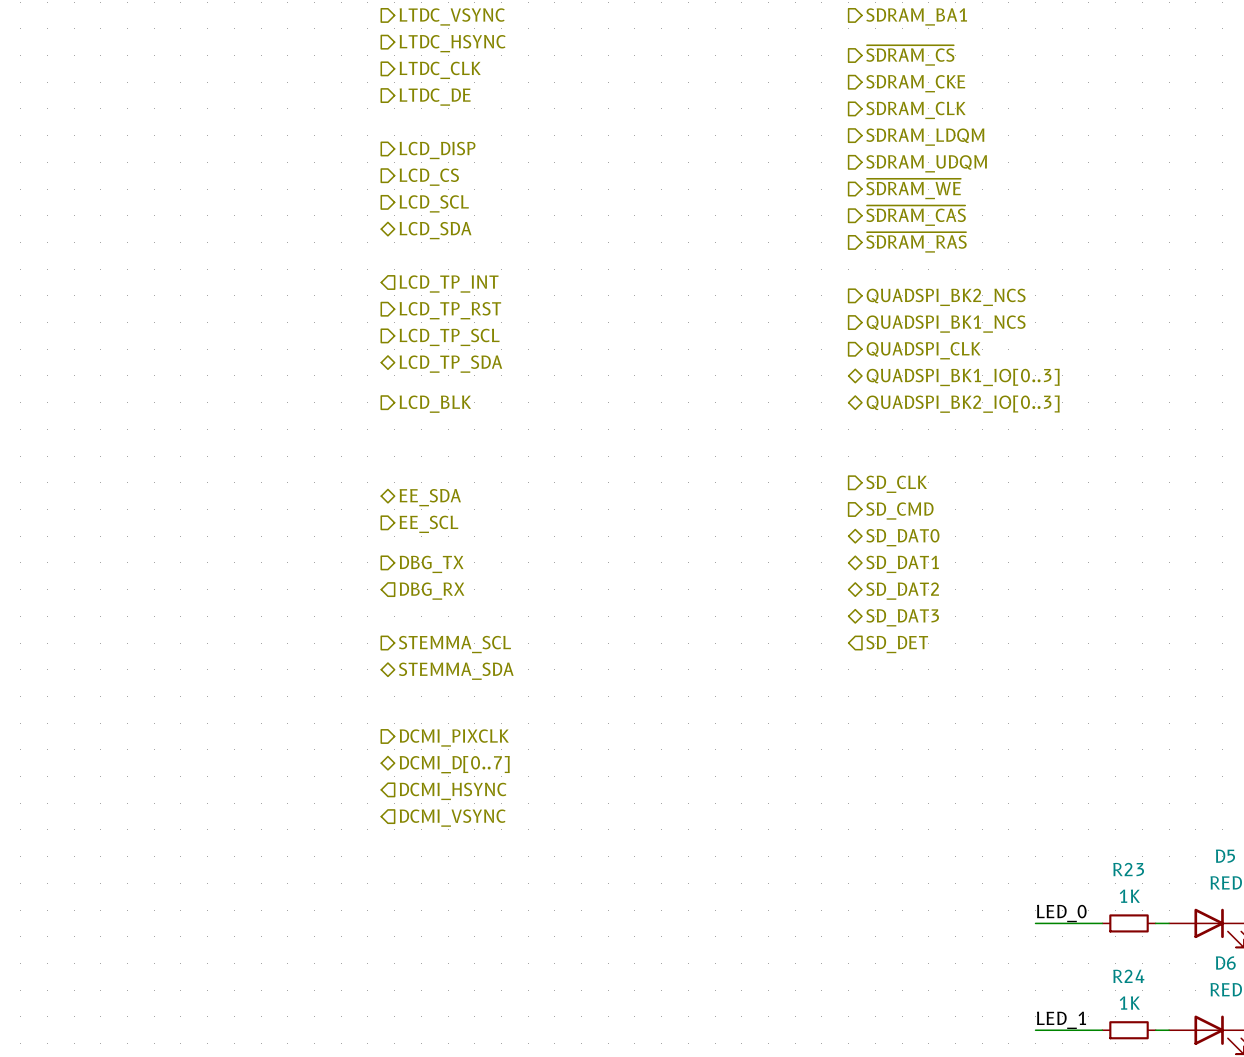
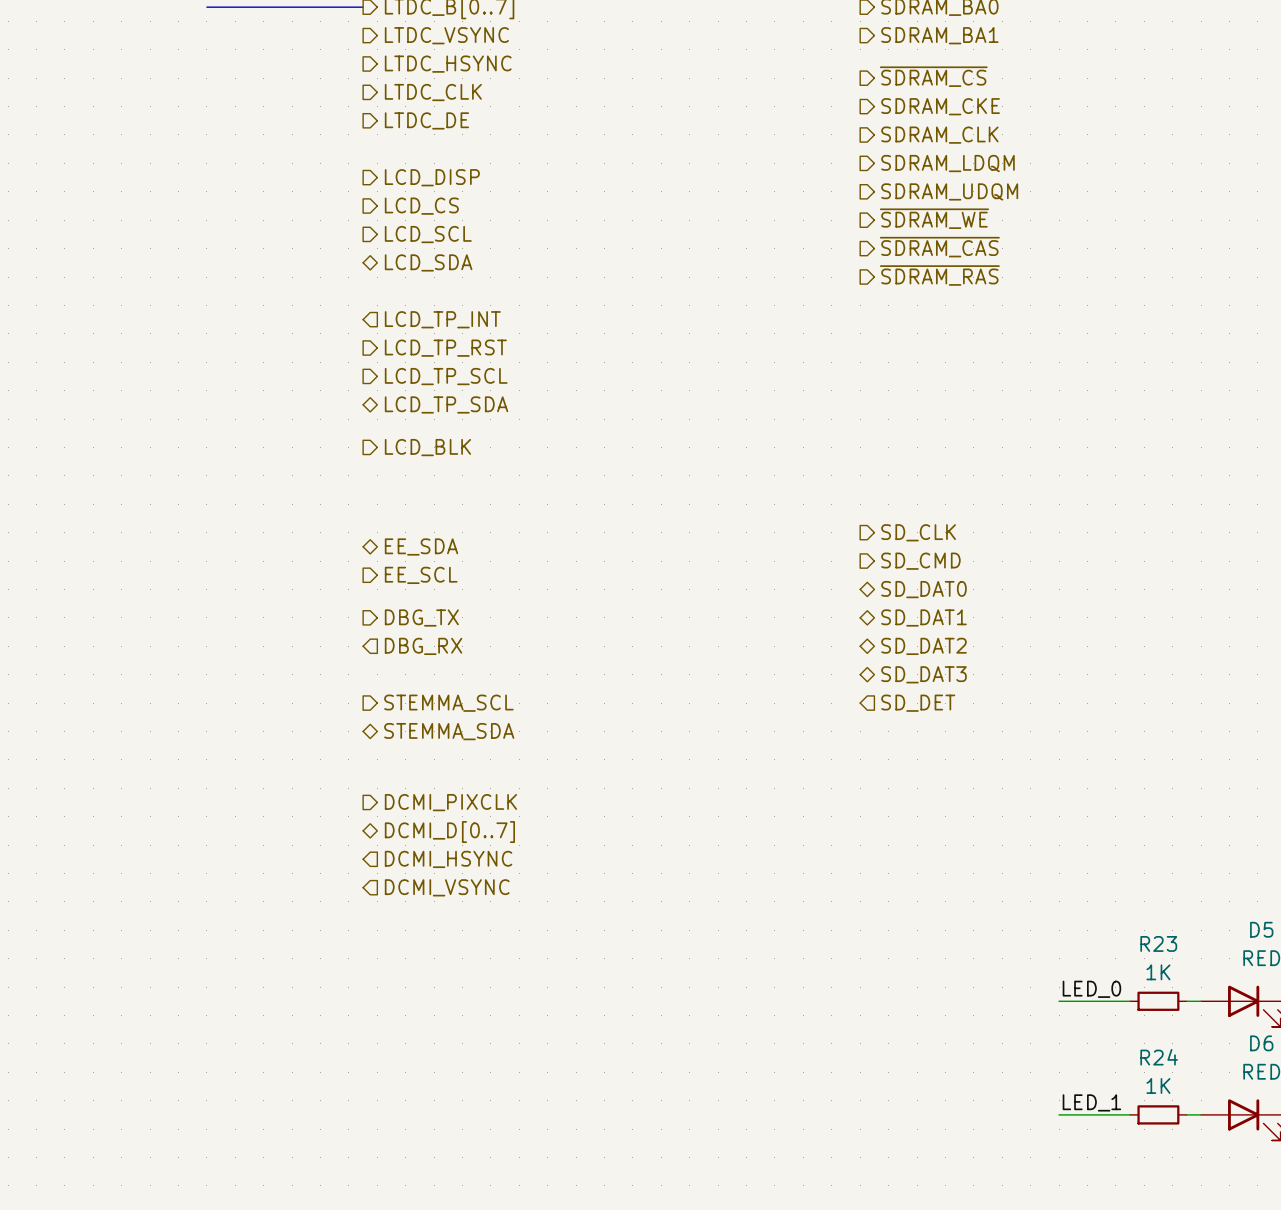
hierarchical label: QUADSPI_BK2_NCS (946, 297) -> none
hierarchical label: QUADSPI_BK1_NCS (946, 324) -> none
hierarchical label: QUADSPI_CLK (923, 350) -> none
hierarchical label: QUADSPI_BK1_IO[0..3] (963, 377) -> none
hierarchical label: QUADSPI_BK2_IO[0..3] (963, 404) -> none

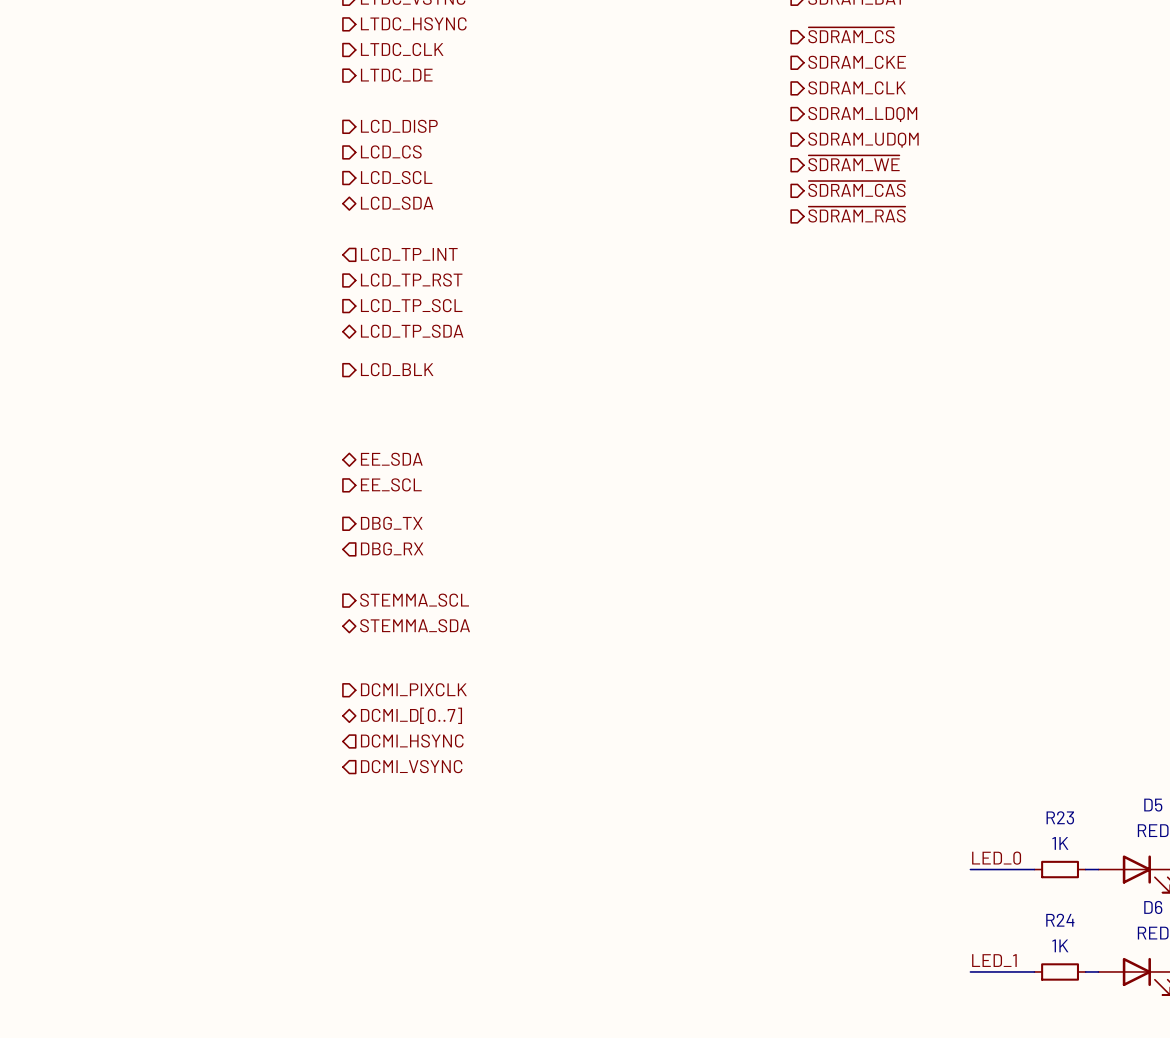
hierarchical label: SD_CLK (918, 532) -> none
hierarchical label: SD_CMD (920, 561) -> none
hierarchical label: SD_DAT0 (923, 589) -> none
hierarchical label: SD_DAT1 (923, 617) -> none
hierarchical label: SD_DAT2 (923, 646) -> none
hierarchical label: SD_DAT3 (923, 674) -> none
hierarchical label: SD_DET (918, 703) -> none

